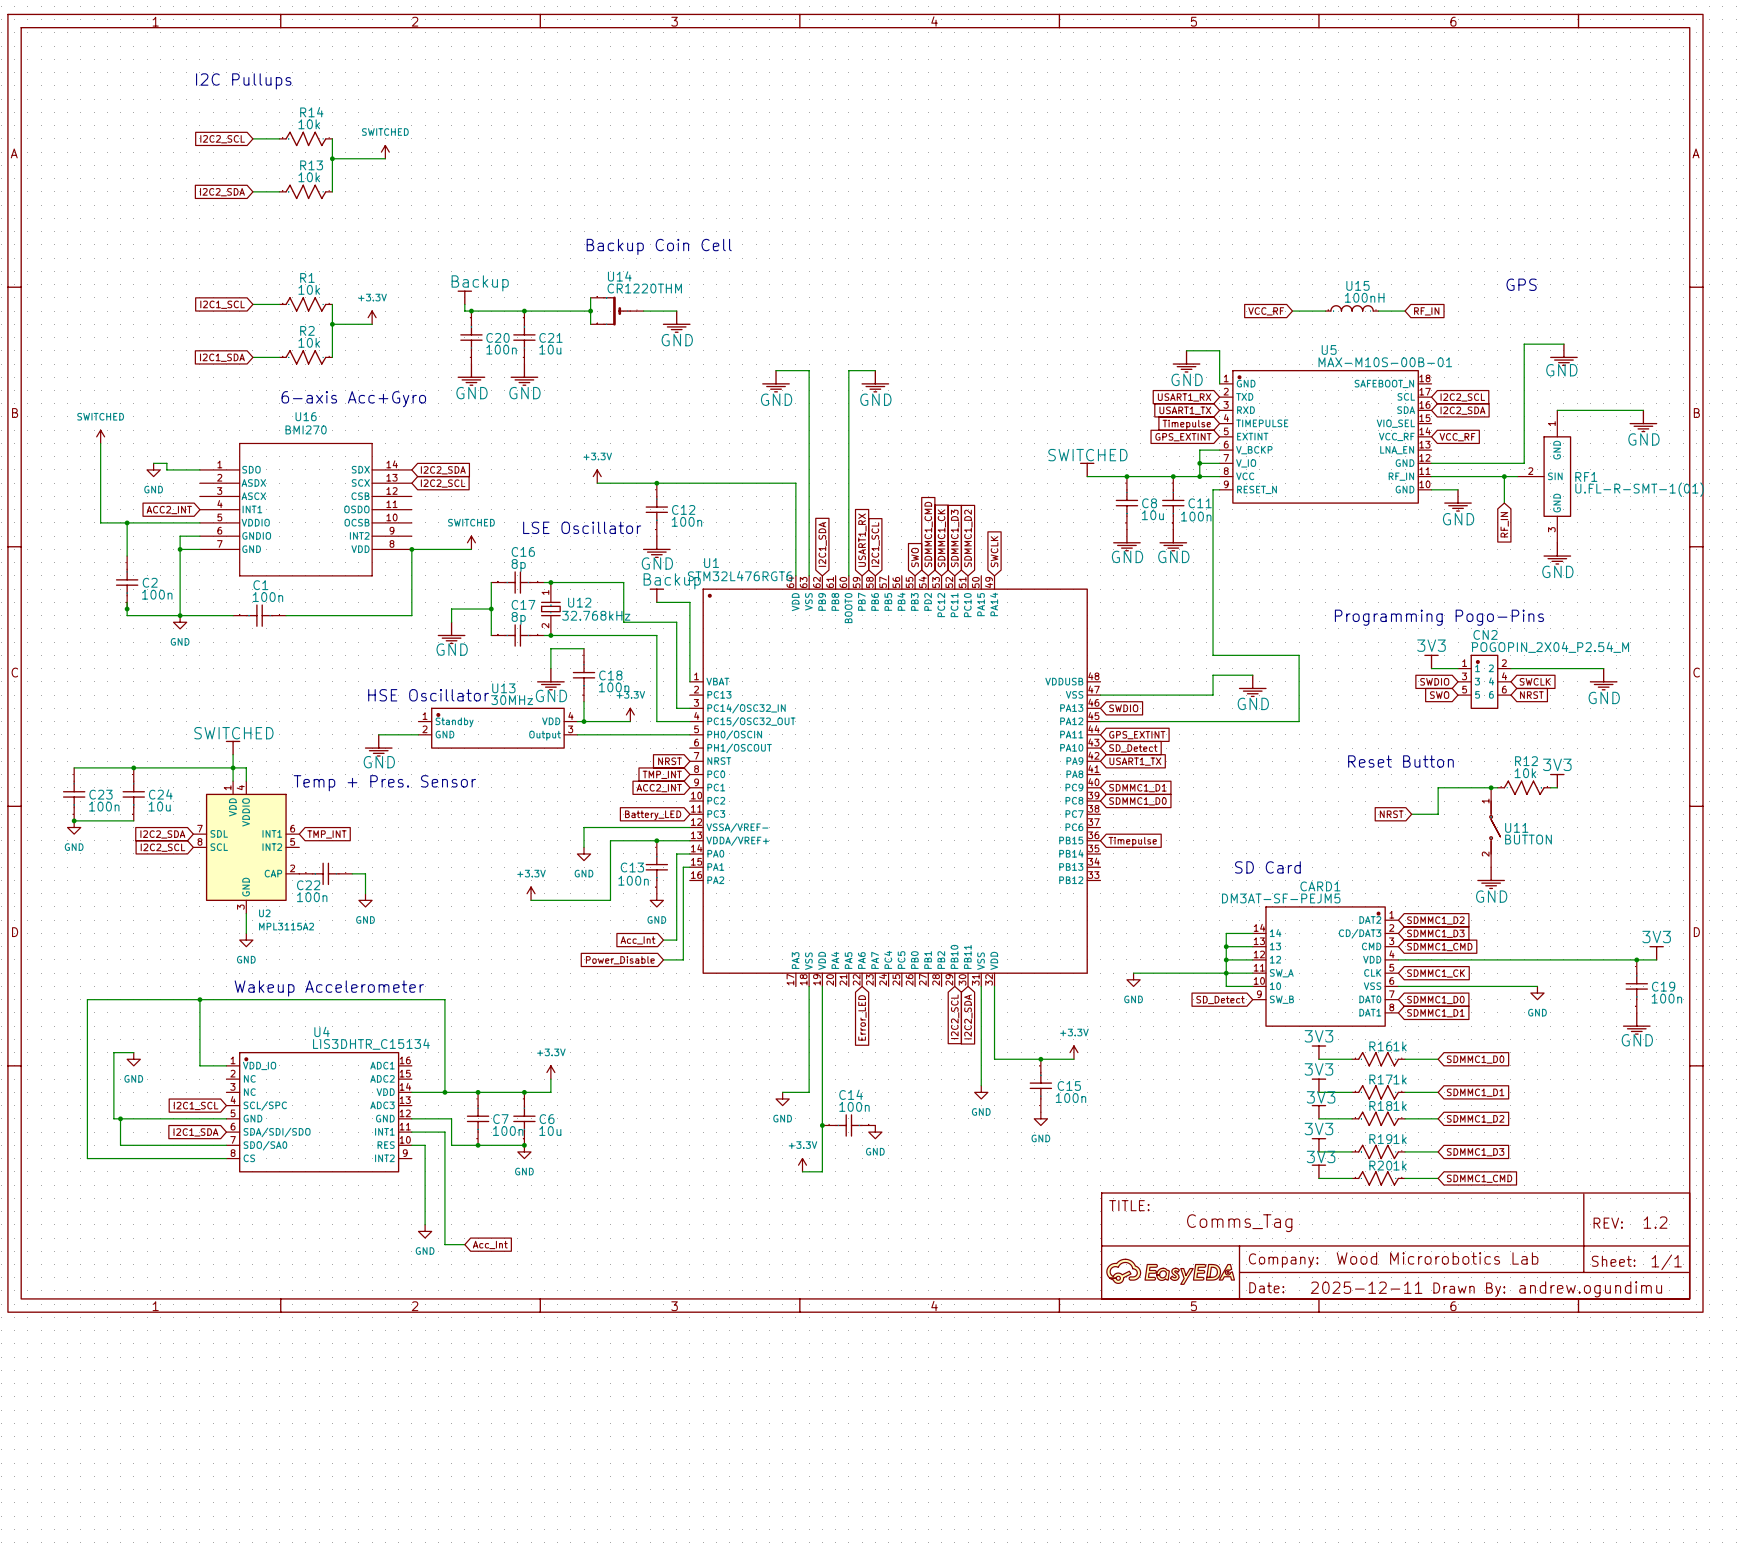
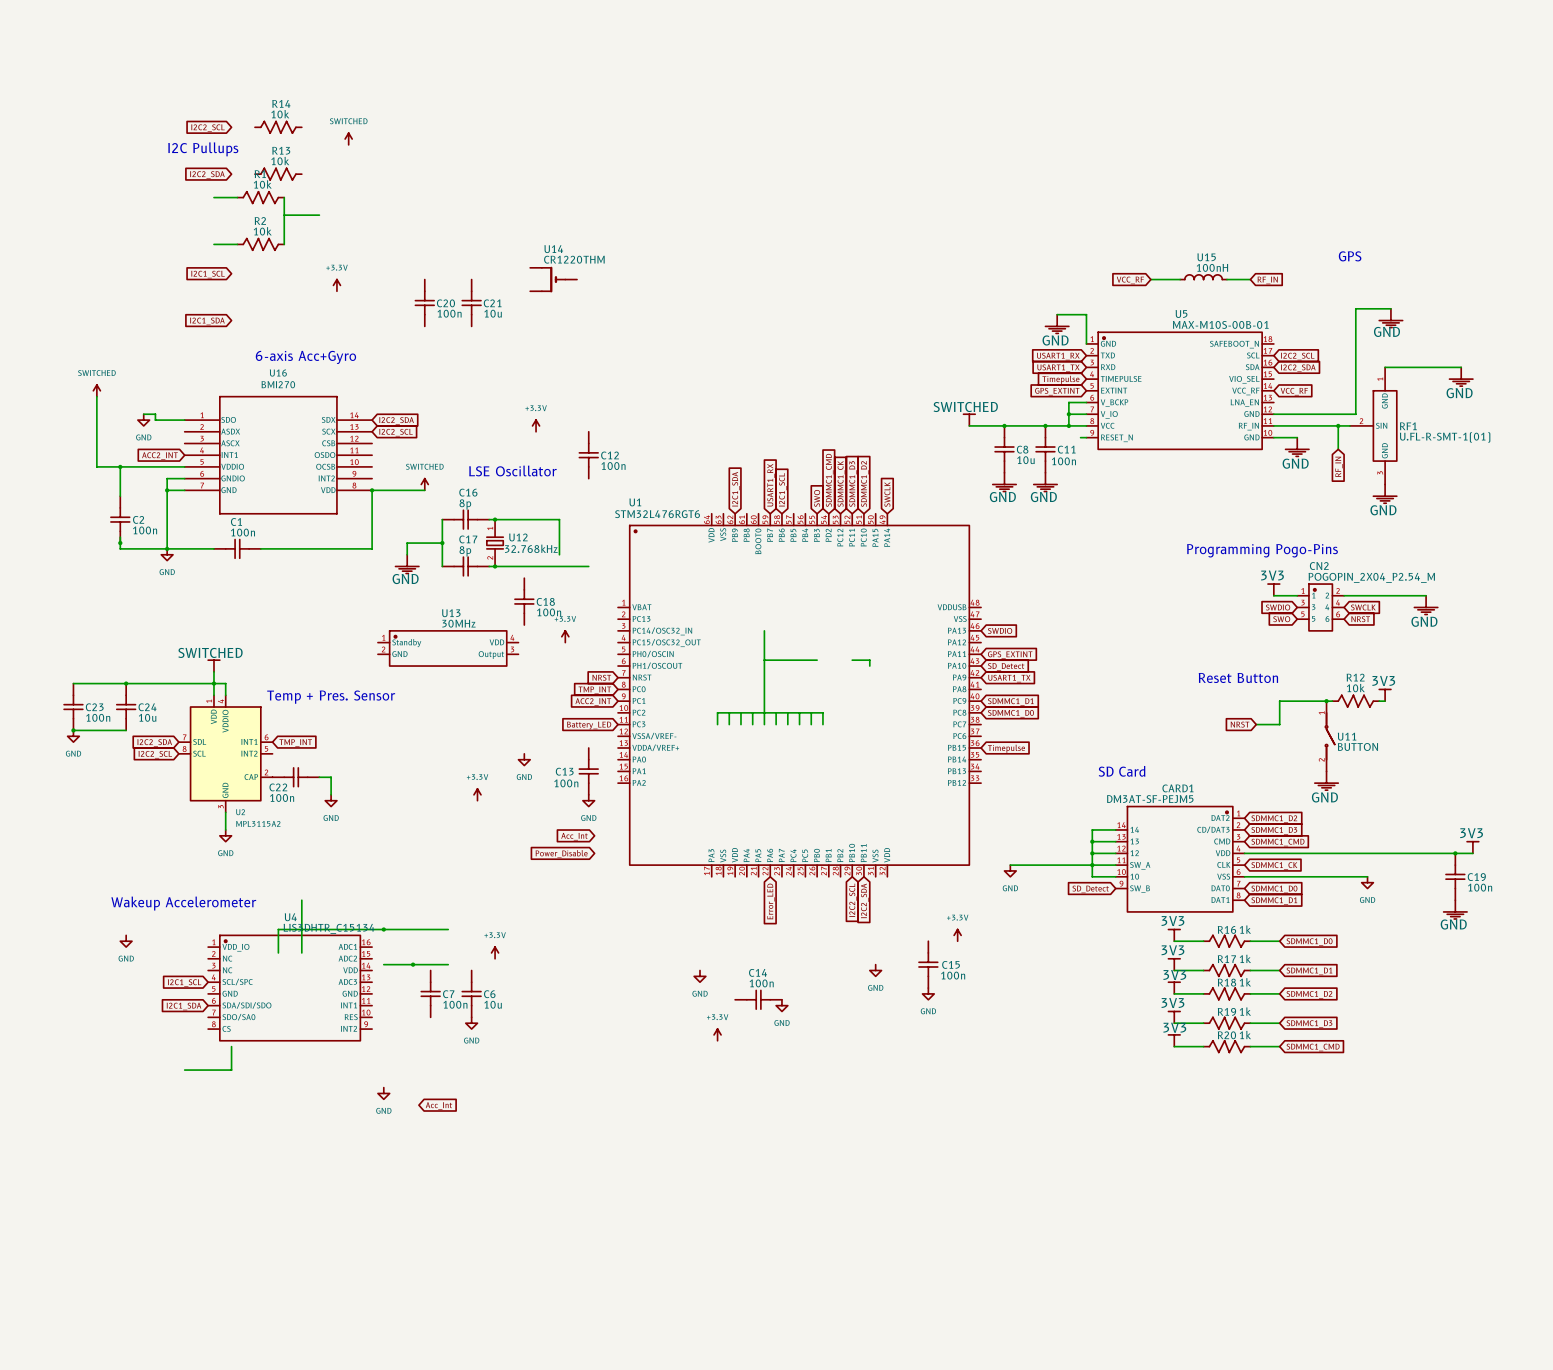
text position: I2C Pullups (243, 81) -> I2C Pullups (203, 149)
wire: (252, 138) (279, 138) -> none
wire: (332, 138) (332, 191) -> none
wire: (332, 158) (385, 158) -> none
junction: (332, 158) -> none
wire: (252, 191) (279, 191) -> none
text: Backup Coin Cell (659, 246) -> none
power symbol: Backup (464, 297) -> none
wire: (590, 297) (590, 324) -> none
wire: (252, 304) (279, 304) -> (213, 197) (237, 197)
R1 position: (305, 304) -> (260, 197)
wire: (332, 304) (332, 357) -> (284, 197) (284, 244)
wire: (464, 304) (464, 311) (590, 311) -> none
junction: (471, 311) -> none
junction: (524, 311) -> none
junction: (590, 311) -> none
wire: (643, 311) (676, 311) -> none
power symbol: GND (676, 321) -> none
wire: (332, 324) (372, 324) -> (284, 215) (319, 215)
junction: (332, 324) -> none
wire: (252, 357) (279, 357) -> (213, 244) (237, 244)
R2 position: (305, 357) -> (260, 244)
wire: (776, 370) (809, 370) (809, 575) -> none
wire: (875, 370) (848, 370) (848, 575) -> none
power symbol: GND (471, 374) -> none
power symbol: GND (524, 374) -> none
power symbol: GND (776, 381) -> none
power symbol: GND (875, 381) -> none
wire: (597, 483) (795, 483) (795, 575) -> none
junction: (656, 483) -> none
wire: (1213, 489) (1213, 655) (1299, 655) (1299, 721) (1100, 721) -> none
power symbol: GND (656, 546) -> none
power symbol: Backup (656, 595) -> none
wire: (656, 602) (689, 602) (689, 681) -> none
wire: (623, 622) (676, 622) (676, 708) (689, 708) -> none
wire: (656, 635) (656, 721) (689, 721) -> none
wire: (584, 648) (550, 648) (550, 668) -> none
part: (855, 663) -> none
wire: (1252, 675) (1213, 675) (1213, 695) (1100, 695) -> none
power symbol: GND (550, 679) -> none
power symbol: GND (1252, 685) -> none
text: HSE Oscillator (428, 695) -> none
wire: (584, 701) (584, 721) -> none
wire: none -> (764, 630) (764, 724)
wire: (577, 721) (630, 721) -> none
junction: (584, 721) -> none
wire: (378, 734) (418, 734) -> none
wire: (577, 734) (689, 734) -> none
wire: none -> (764, 660) (817, 660)
wire: none -> (852, 660) (869, 660) (869, 666)
power symbol: GND (378, 745) -> none
wire: none -> (729, 712) (729, 724)
wire: none -> (740, 712) (740, 724)
wire: none -> (752, 712) (752, 724)
wire: none -> (776, 712) (776, 724)
wire: none -> (787, 712) (787, 724)
wire: none -> (799, 712) (799, 724)
wire: none -> (811, 712) (811, 724)
wire: none -> (717, 724) (717, 712) (822, 712) (822, 724)
wire: (689, 827) (584, 827) (584, 847) -> none
junction: (656, 840) -> none
wire: (689, 840) (610, 840) (610, 900) (531, 900) -> none
wire: (689, 853) (676, 853) (676, 940) (663, 940) -> none
wire: (689, 867) (683, 867) (683, 959) (663, 959) -> none
wire: (809, 986) (809, 1092) (782, 1092) -> none
wire: (822, 986) (822, 1171) (802, 1171) -> none
wire: (981, 986) (981, 1085) -> none
wire: (994, 986) (994, 1059) (1073, 1059) -> none
text position: Wakeup Accelerometer (329, 988) -> Wakeup Accelerometer (183, 903)
wire: (199, 999) (199, 1065) (226, 1065) -> none
junction: (199, 999) -> none
wire: none -> (301, 900) (301, 952)
junction: none -> (383, 929)
wire: none -> (448, 929) (278, 929) (278, 952)
wire: (133, 1052) (113, 1052) (113, 1118) (226, 1118) -> none
junction: (1040, 1059) -> none
wire: (550, 1079) (550, 1092) (411, 1092) -> none
wire: none -> (383, 964) (448, 964)
junction: none -> (413, 964)
wire: (444, 1092) (444, 999) (87, 999) (87, 1158) (226, 1158) -> none
junction: (444, 1092) -> none
junction: (478, 1092) -> none
junction: (524, 1092) -> none
wire: (120, 1118) (120, 1145) (226, 1145) -> none
junction: (120, 1118) -> none
wire: (411, 1118) (451, 1118) (451, 1145) (524, 1145) -> none
junction: (822, 1125) -> none
wire: (411, 1132) (444, 1132) (444, 1244) (464, 1244) -> none
wire: (411, 1145) (425, 1145) (425, 1224) -> none
junction: (478, 1145) -> none
junction: (524, 1145) -> none
wire: none -> (231, 1046) (231, 1070) (184, 1070)

